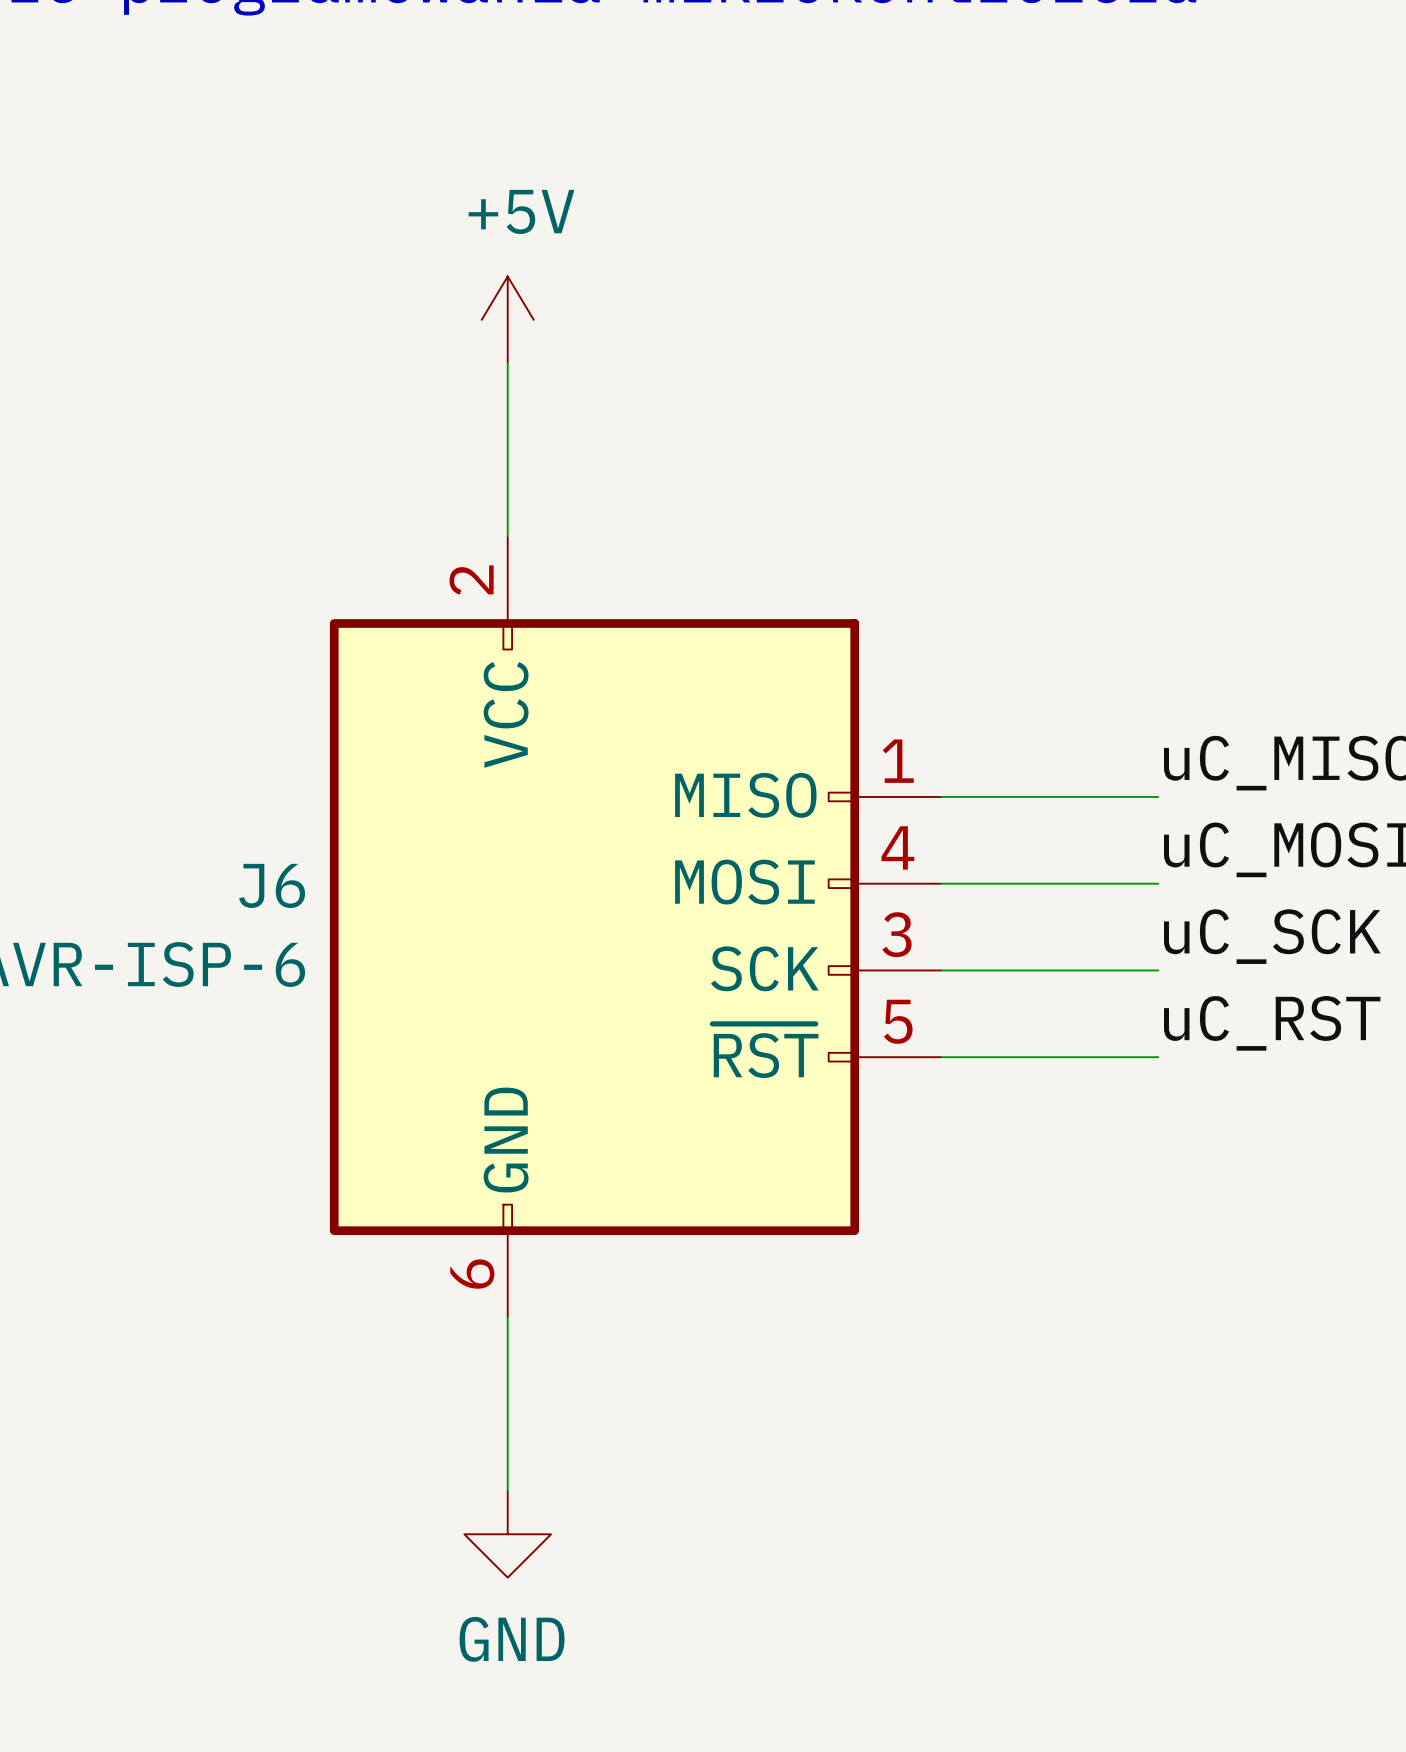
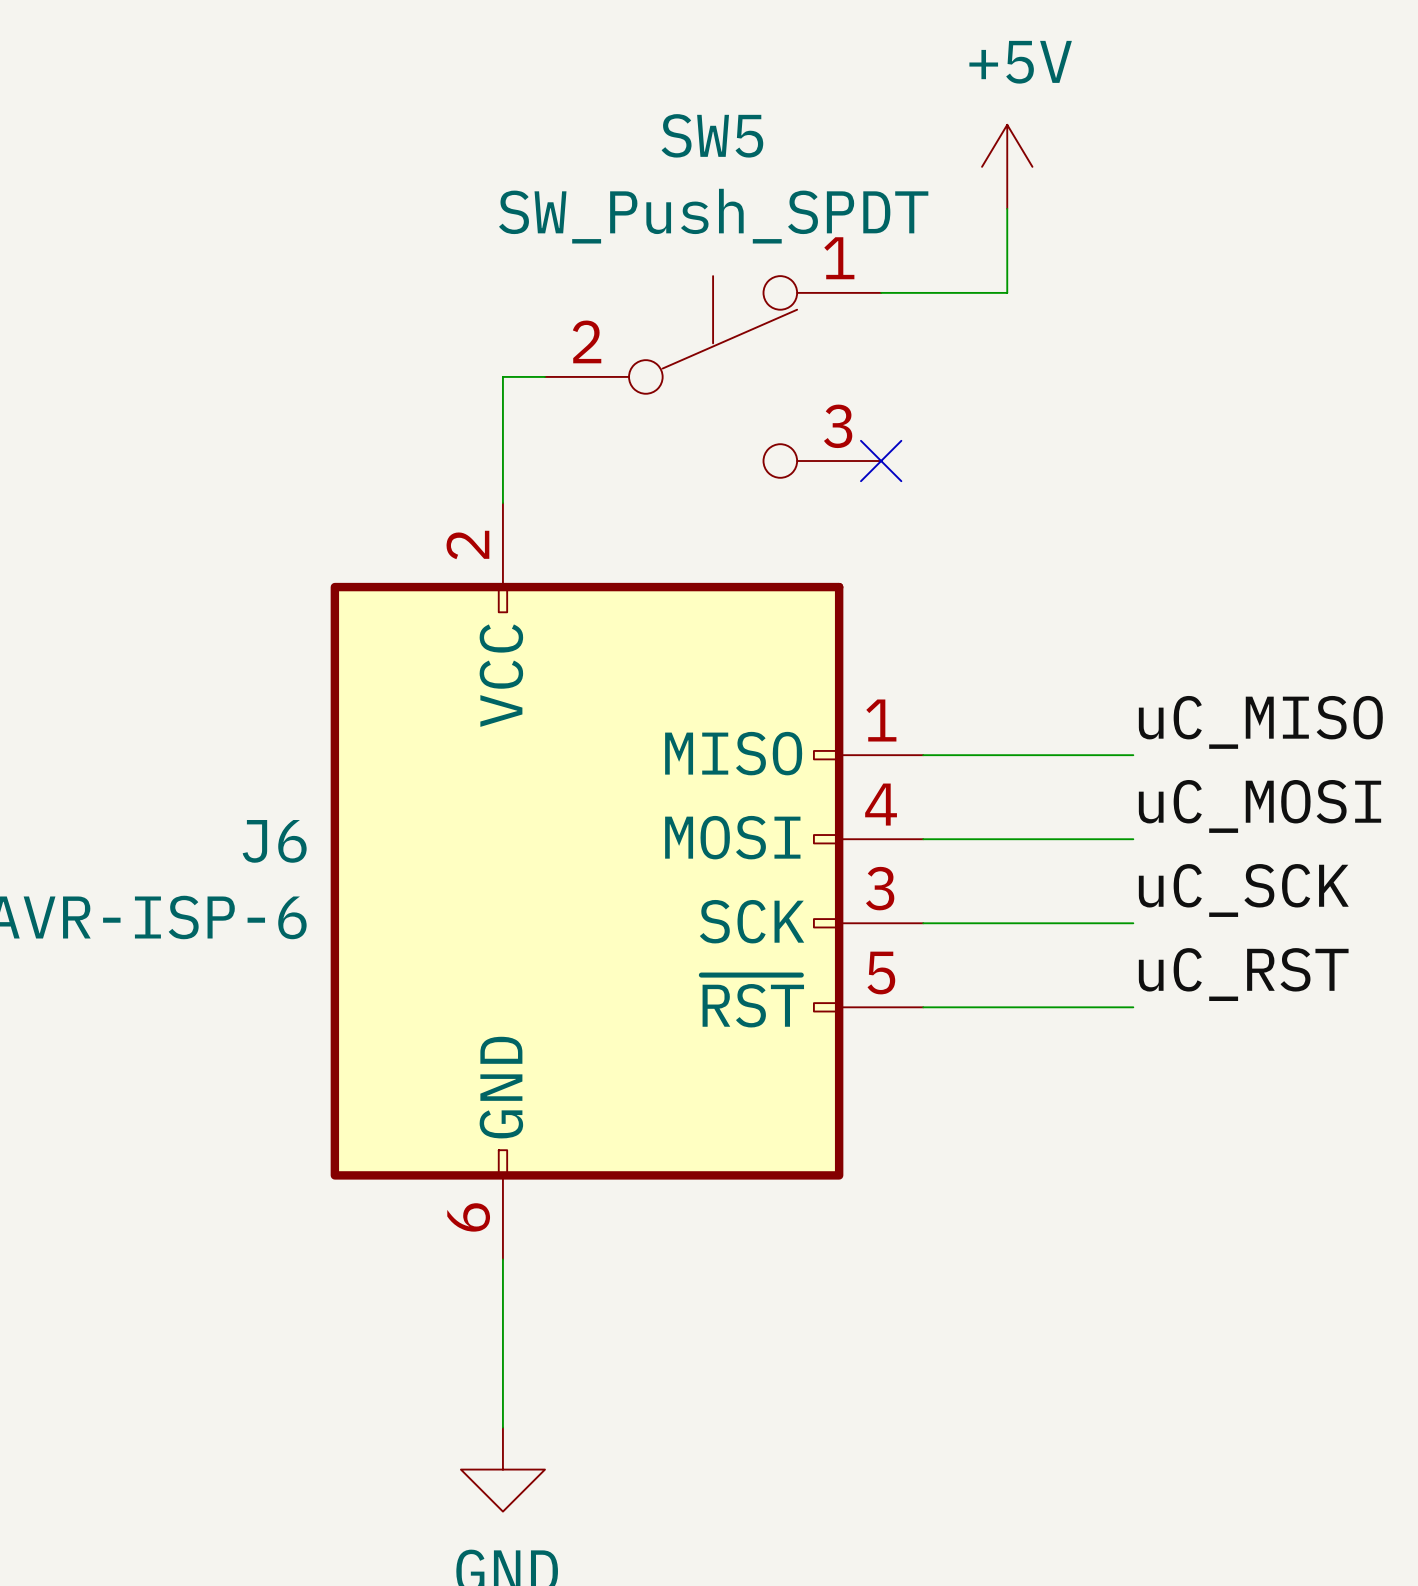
wire: none -> (1007, 208) (1007, 292) (881, 292)
power symbol position: +5V (507, 319) -> +5V (1007, 166)
wire: (507, 363) (507, 406) -> (544, 376) (502, 376)
SW5: none -> SW_Push_SPDT (713, 376)
no-connect mark: none -> (881, 461)

